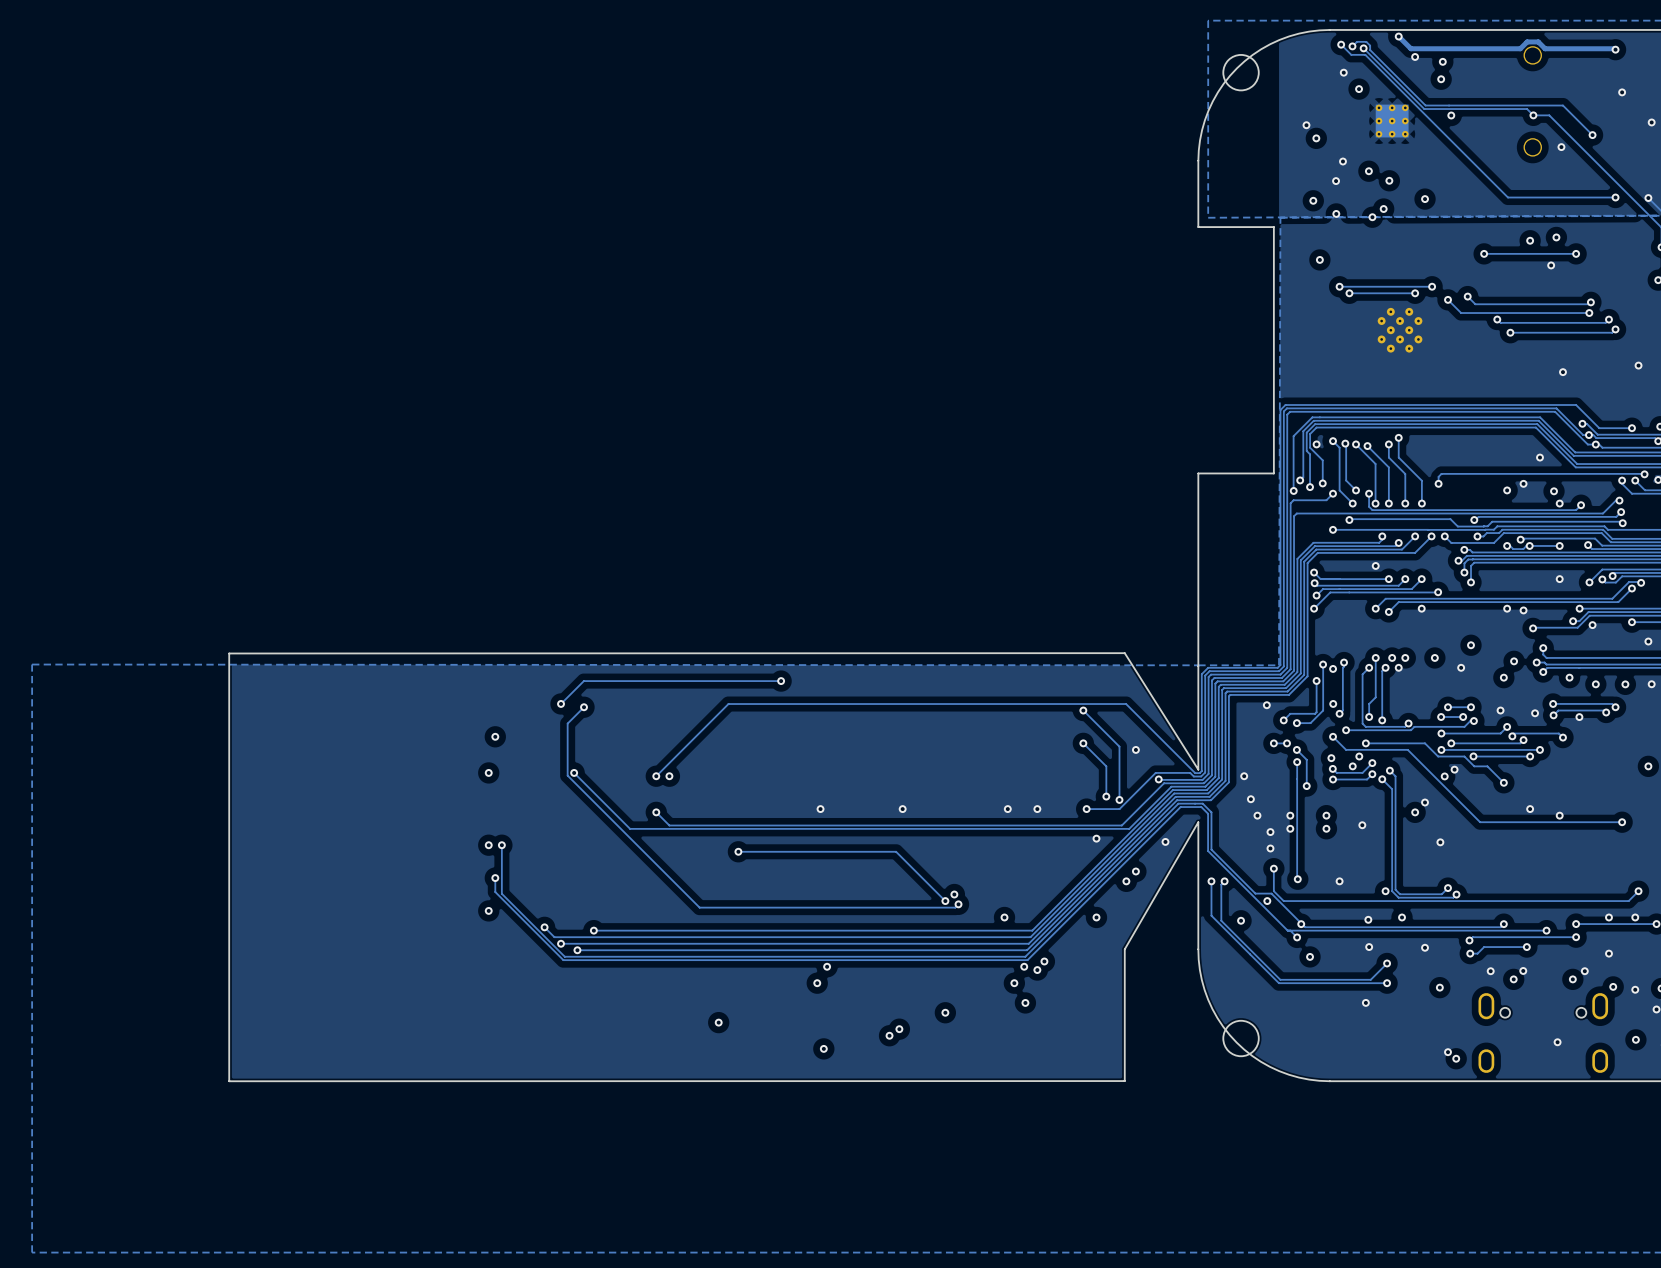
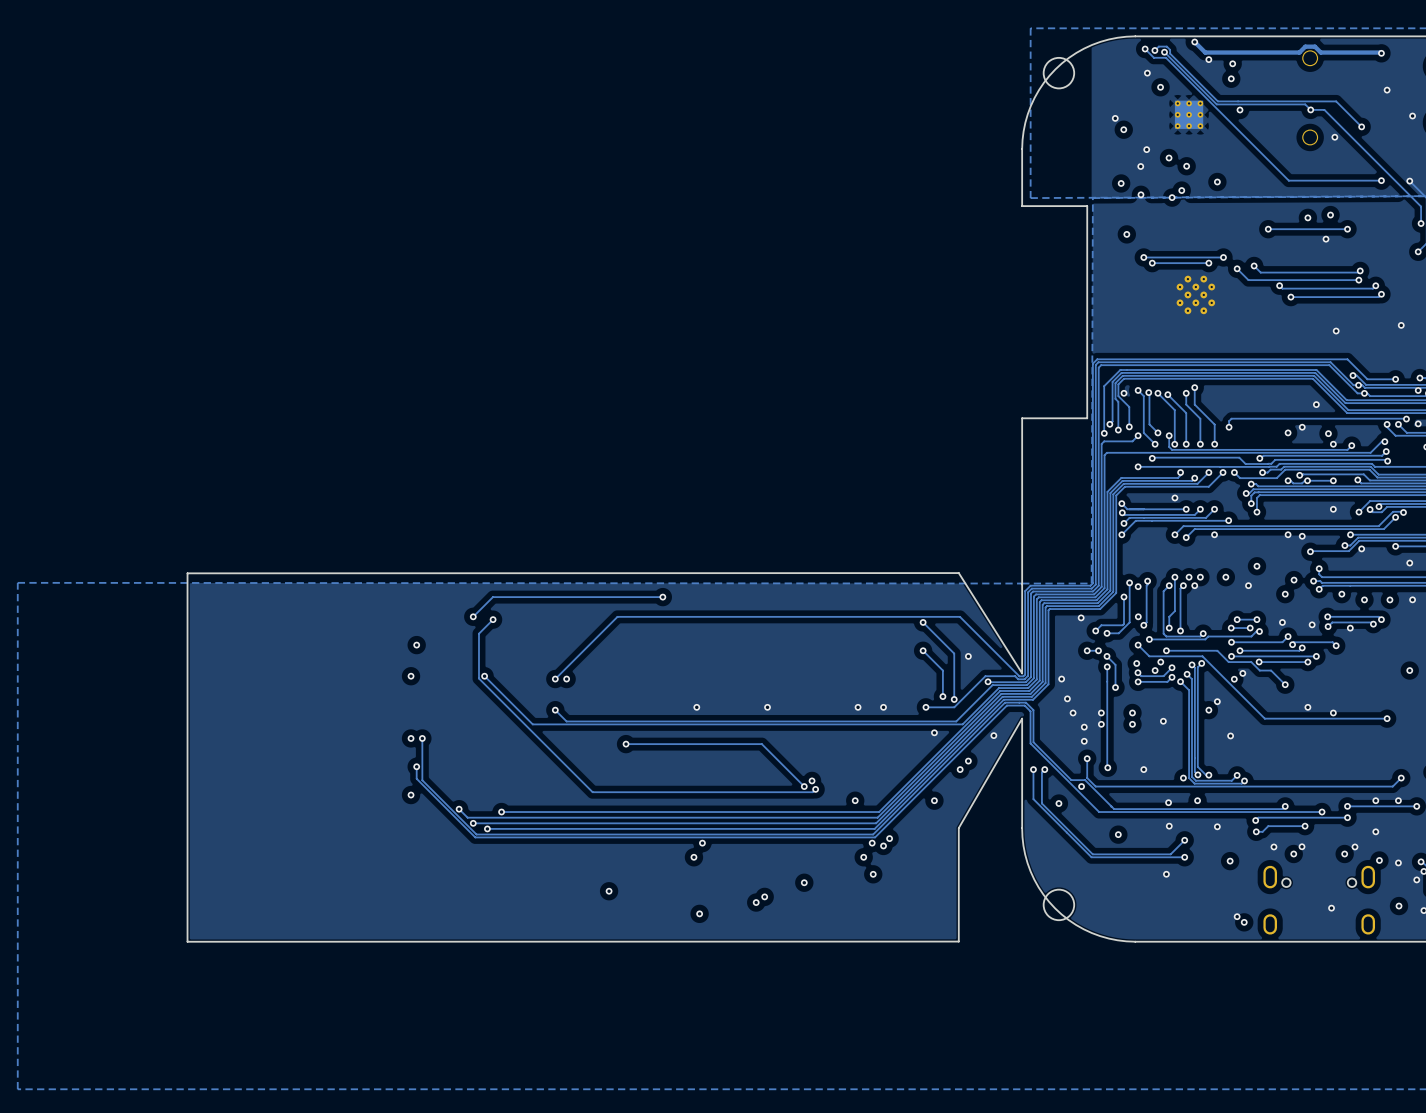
track: none -> (1201, 663) (1197, 667) (1197, 766) (1206, 775) (1208, 775)
via: none -> (1201, 663)
track: none -> (1192, 664) (1194, 667) (1194, 771) (1197, 774)
via: none -> (1192, 664)
via: none -> (1197, 774)
via: none -> (1208, 775)
via: (1301, 924) -> none
track: (1290, 930) (1297, 937) -> none
via: (1297, 937) -> none

